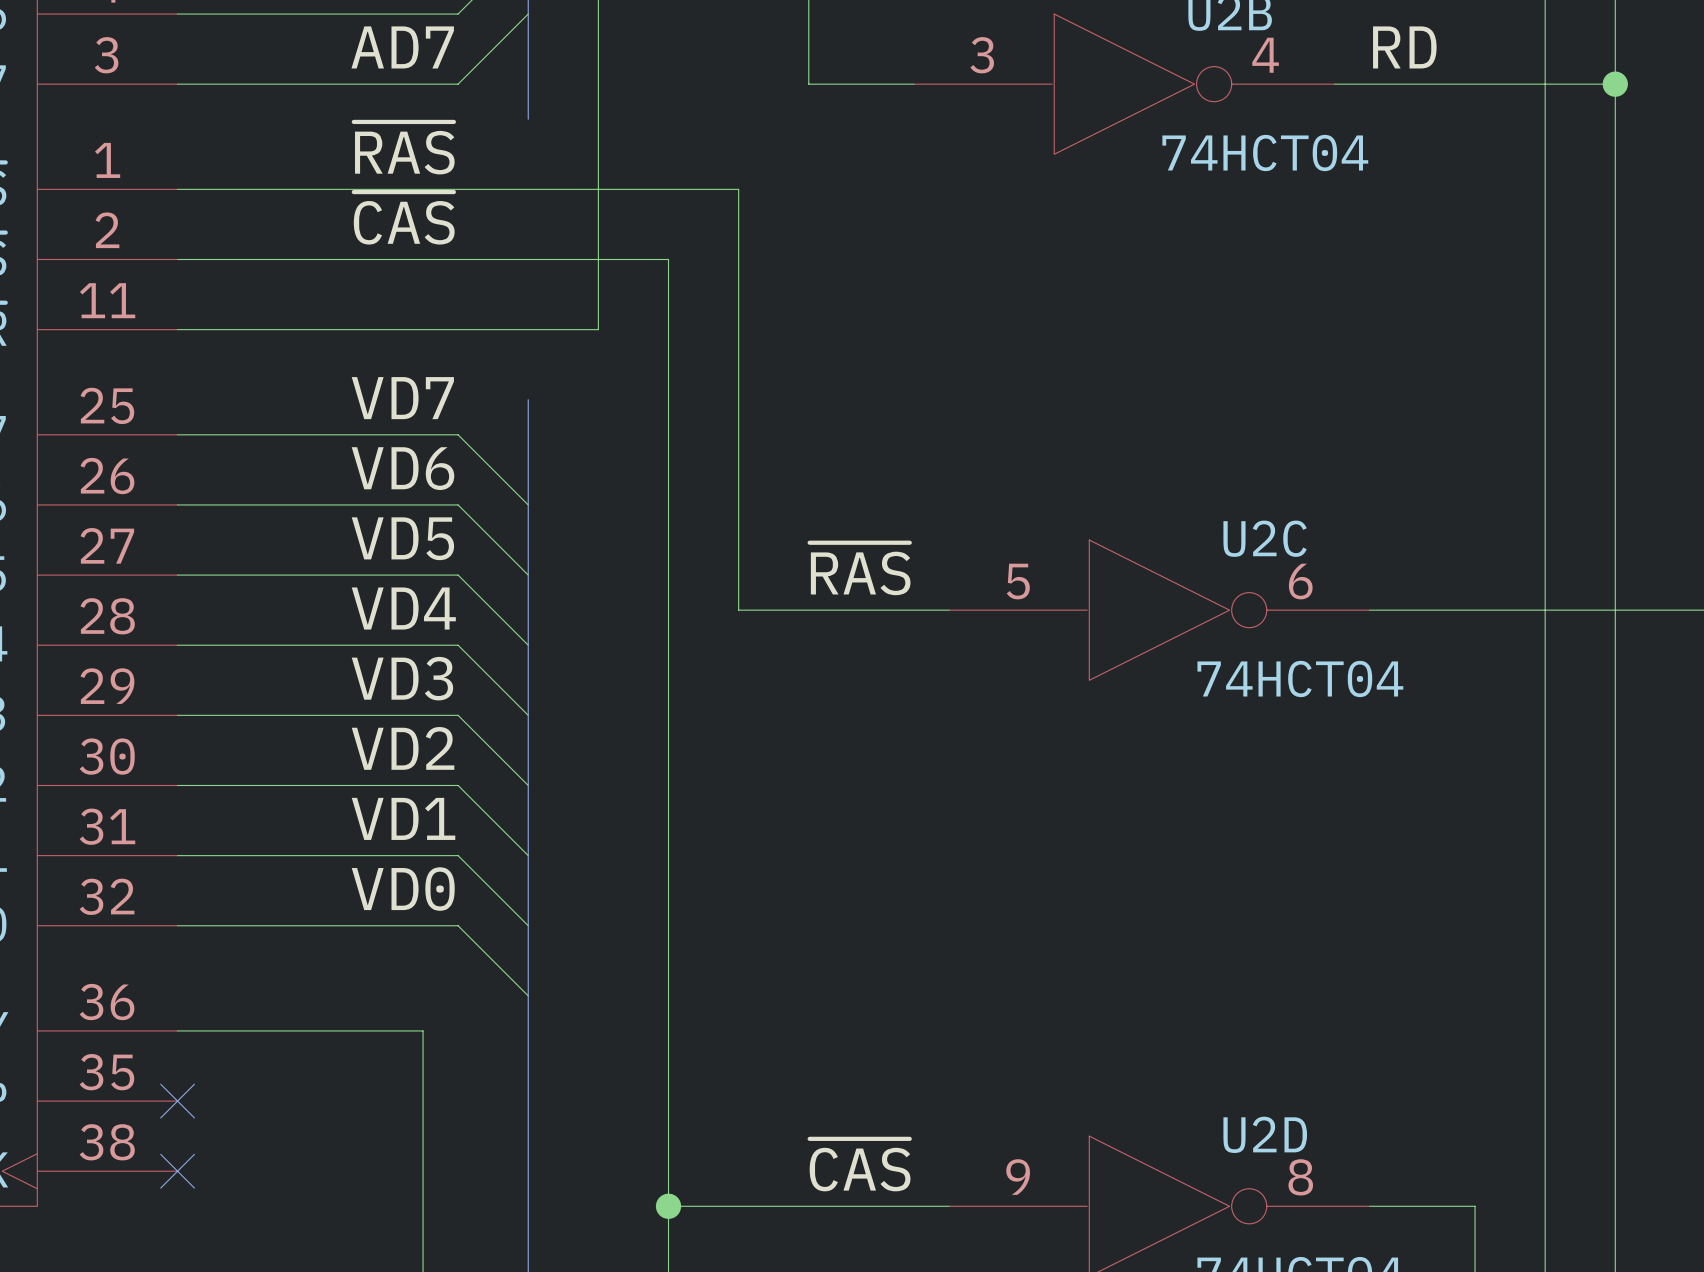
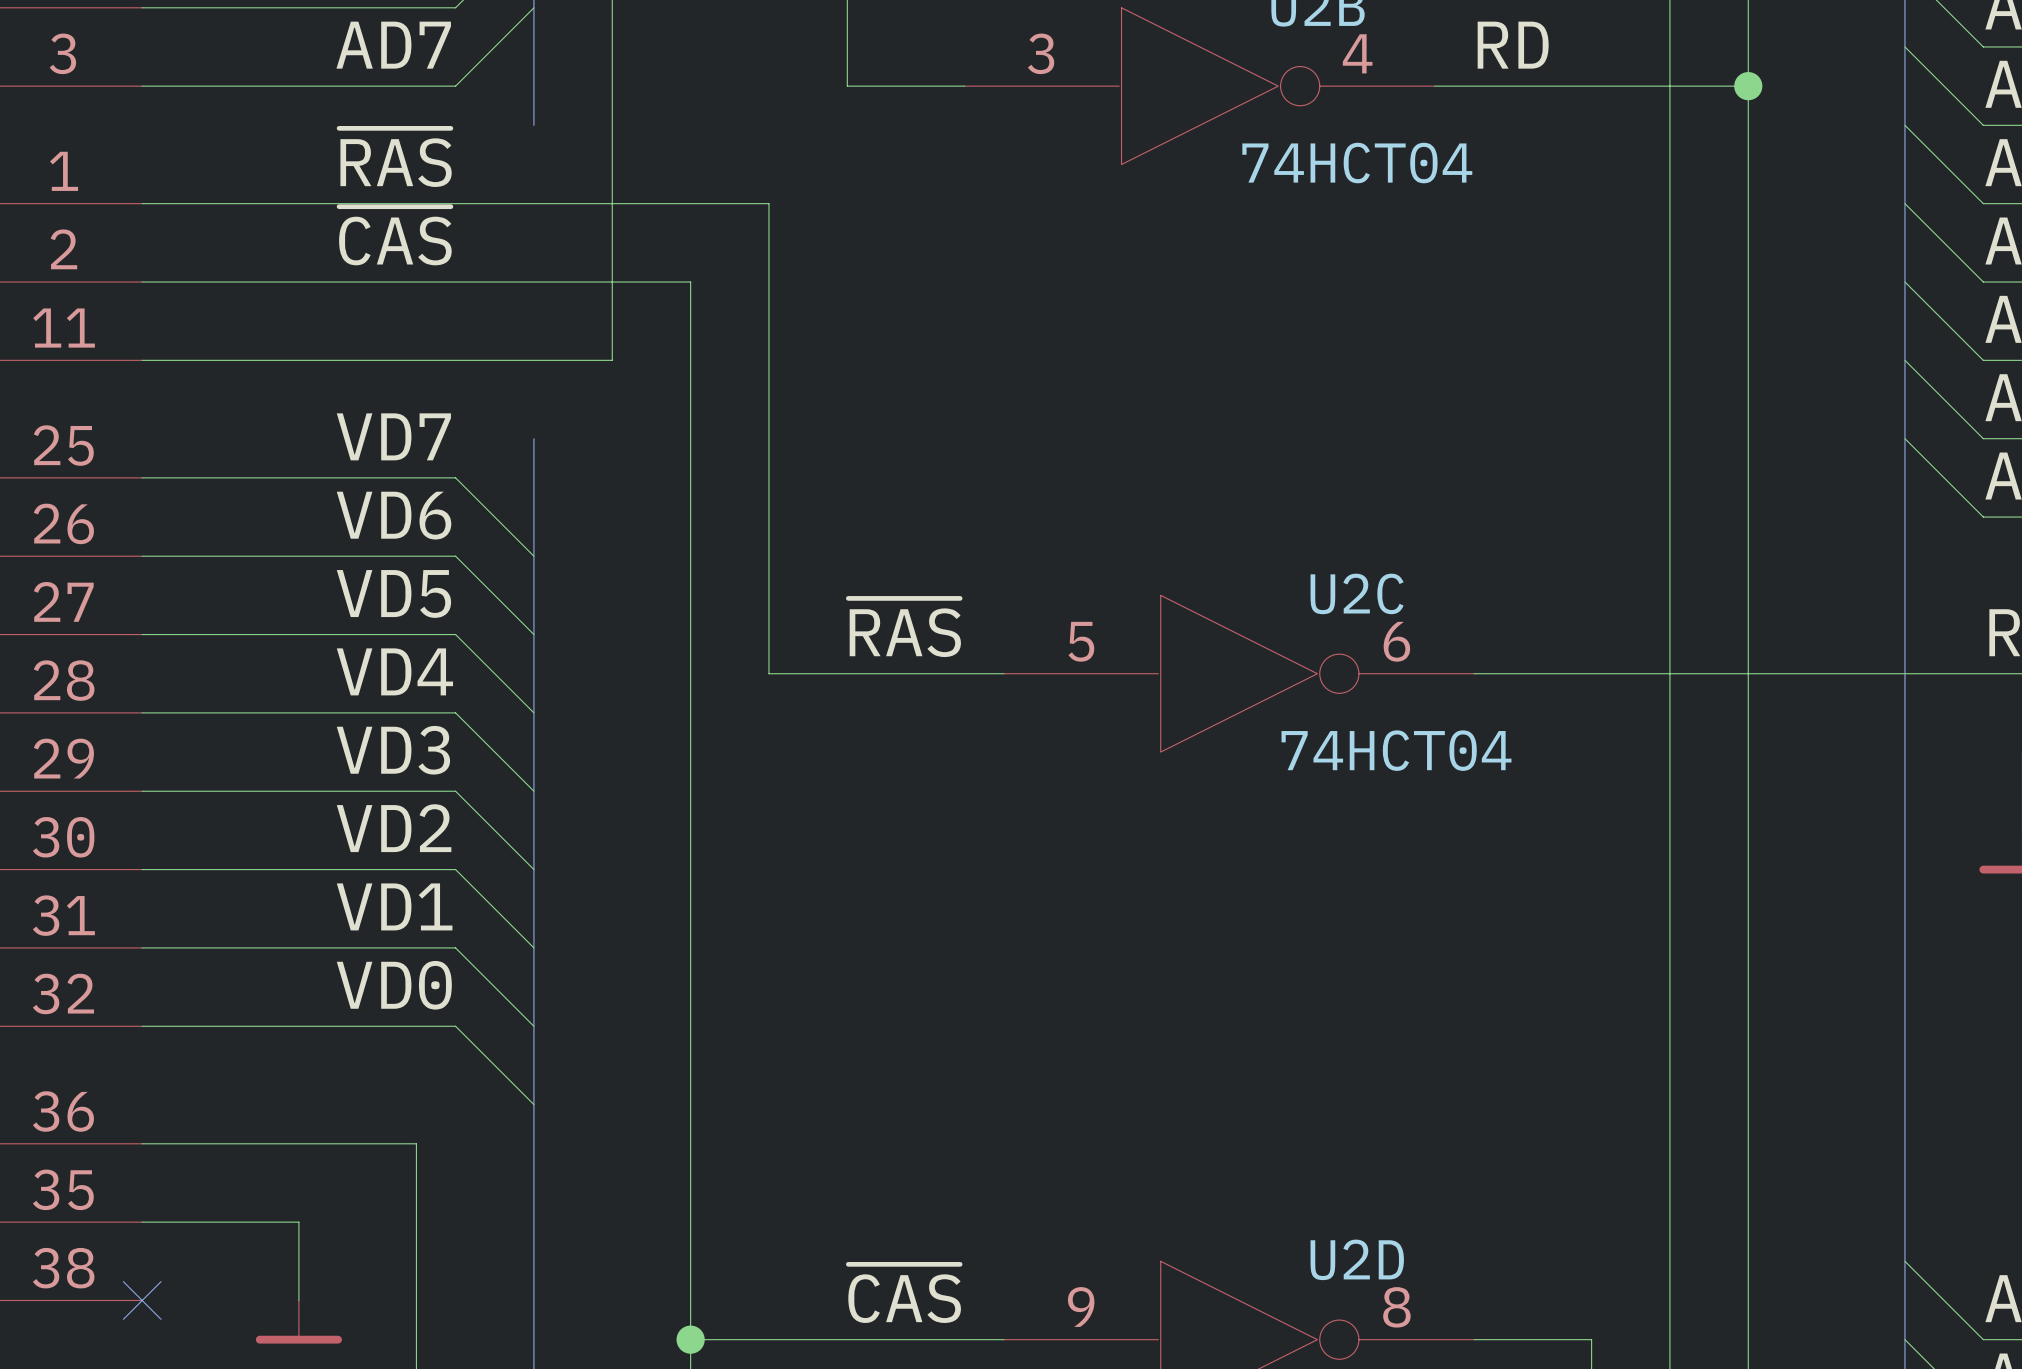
wire: none -> (142, 1222) (298, 1222) (298, 1300)
no-connect mark: (177, 1101) -> none
power symbol: none -> (298, 1322)

